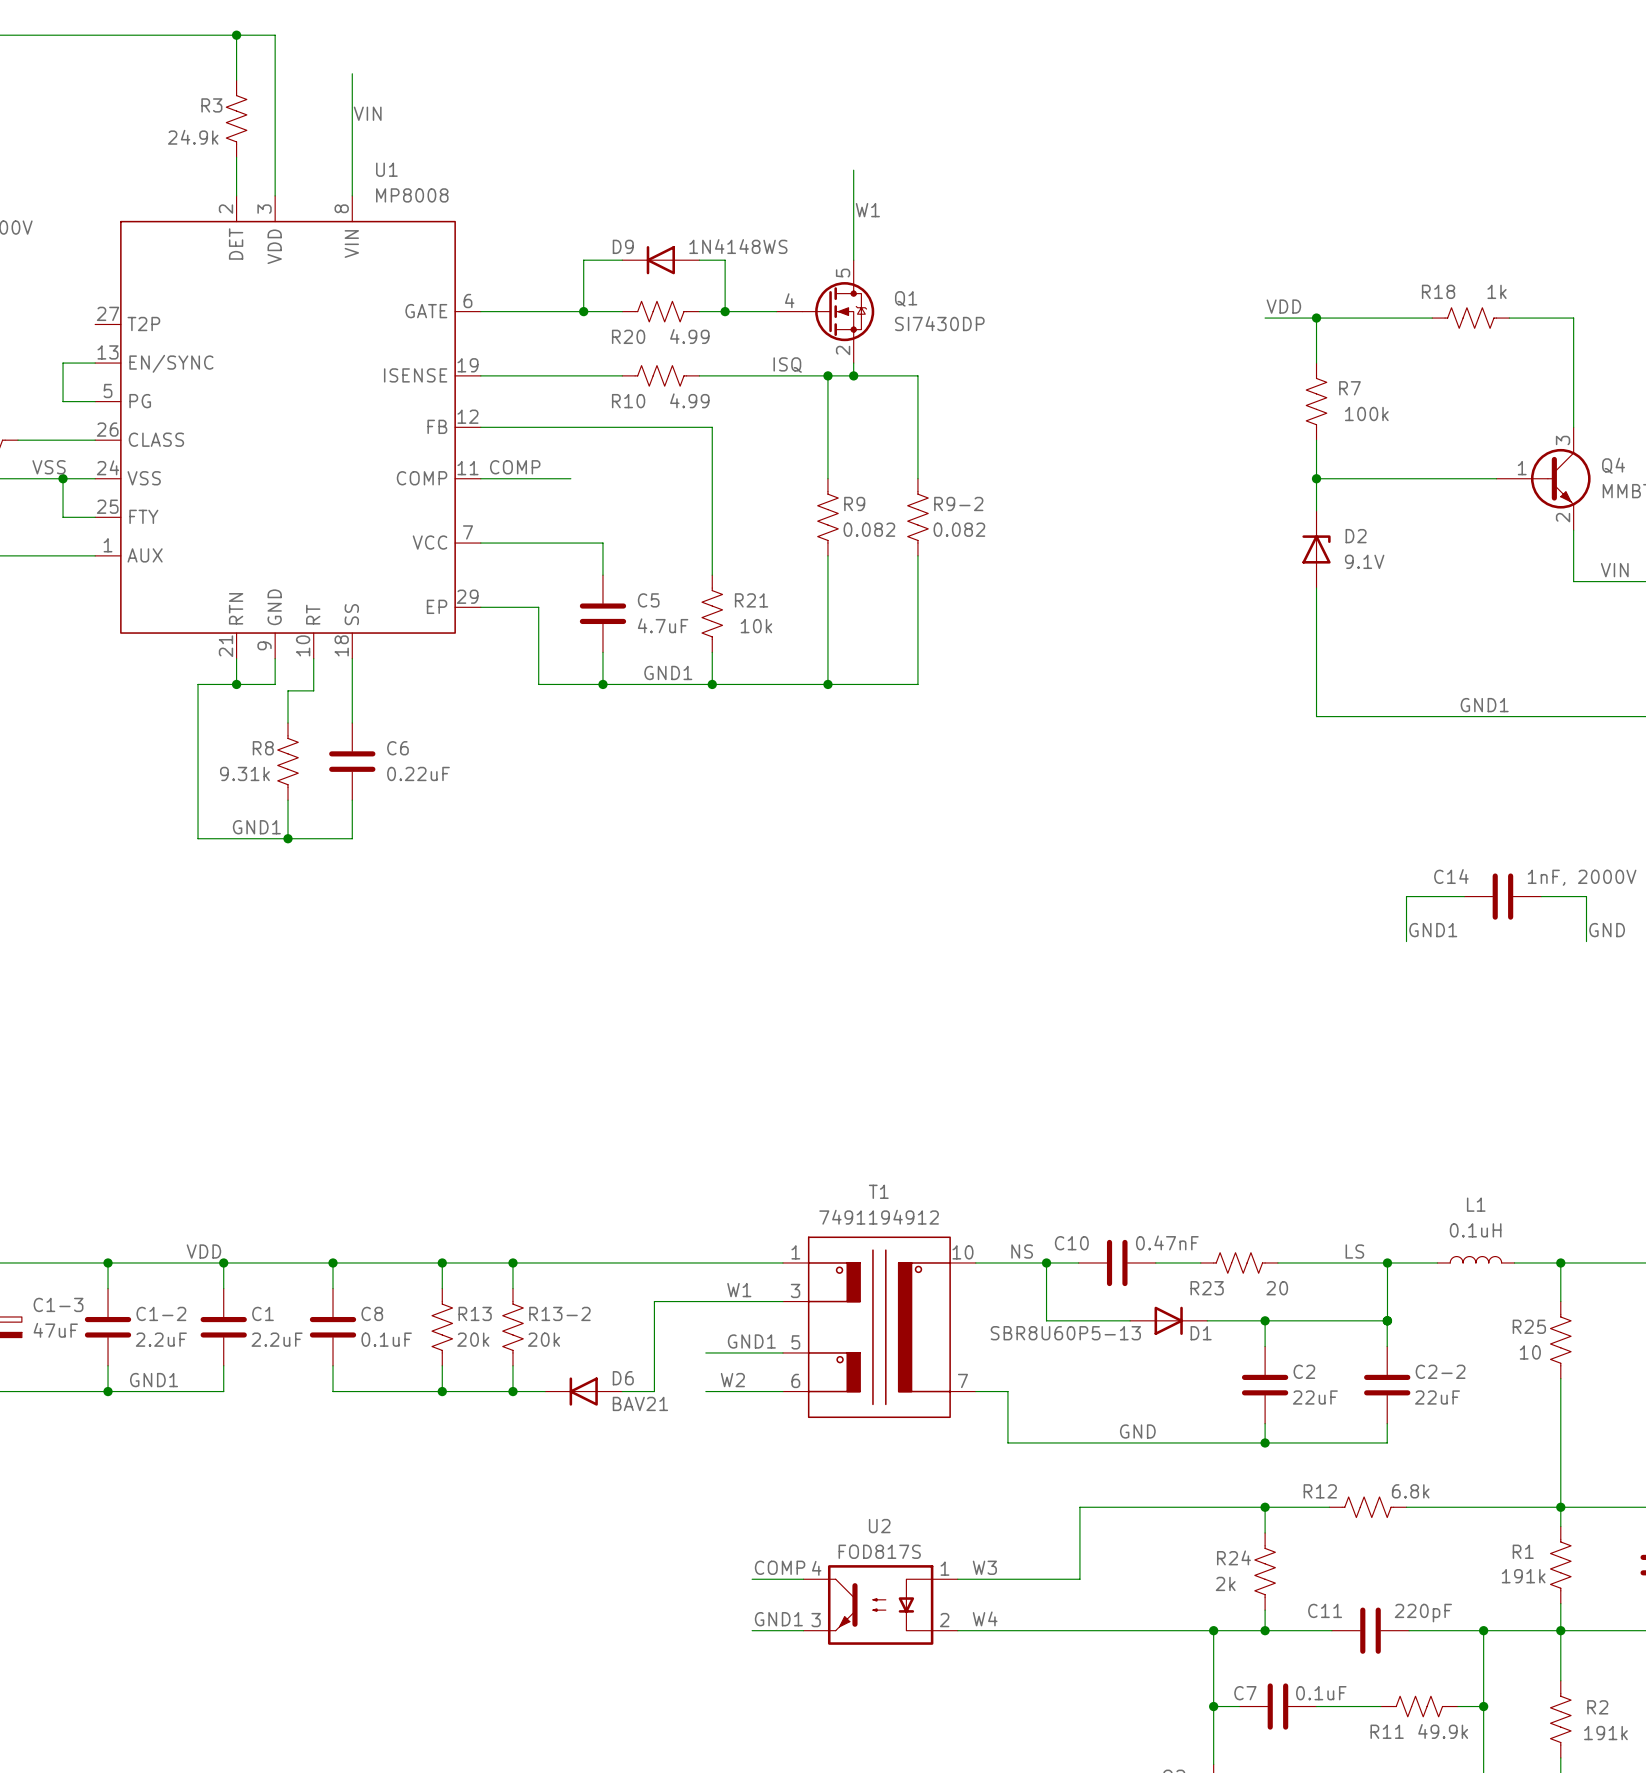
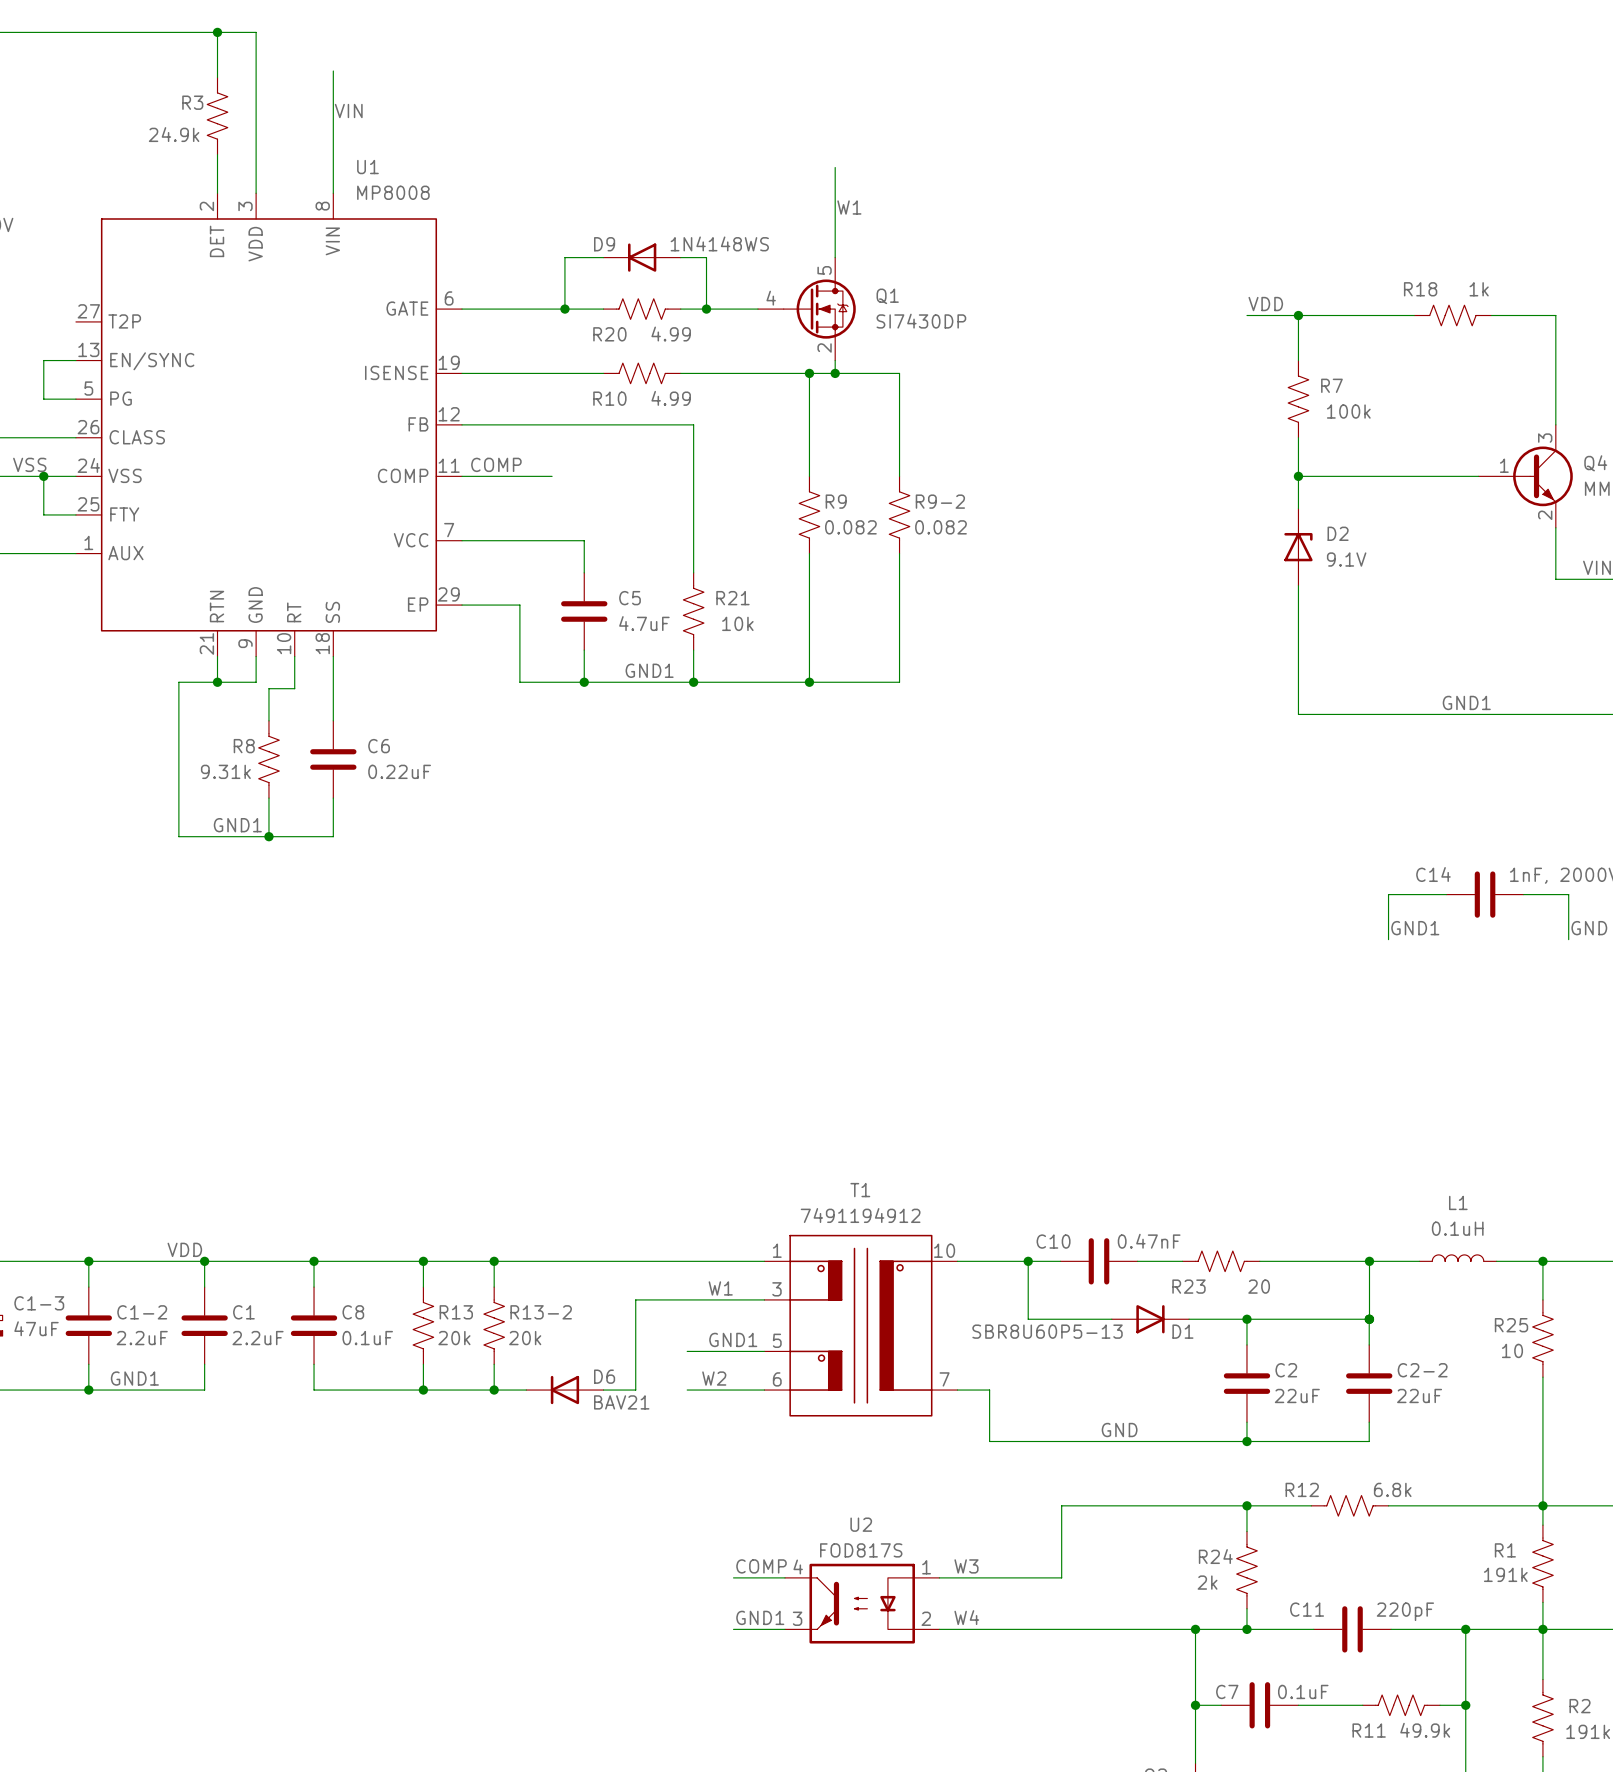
label: ISQ (787, 365) -> none
label: NS (1022, 1251) -> none
label: LS (1354, 1251) -> none

